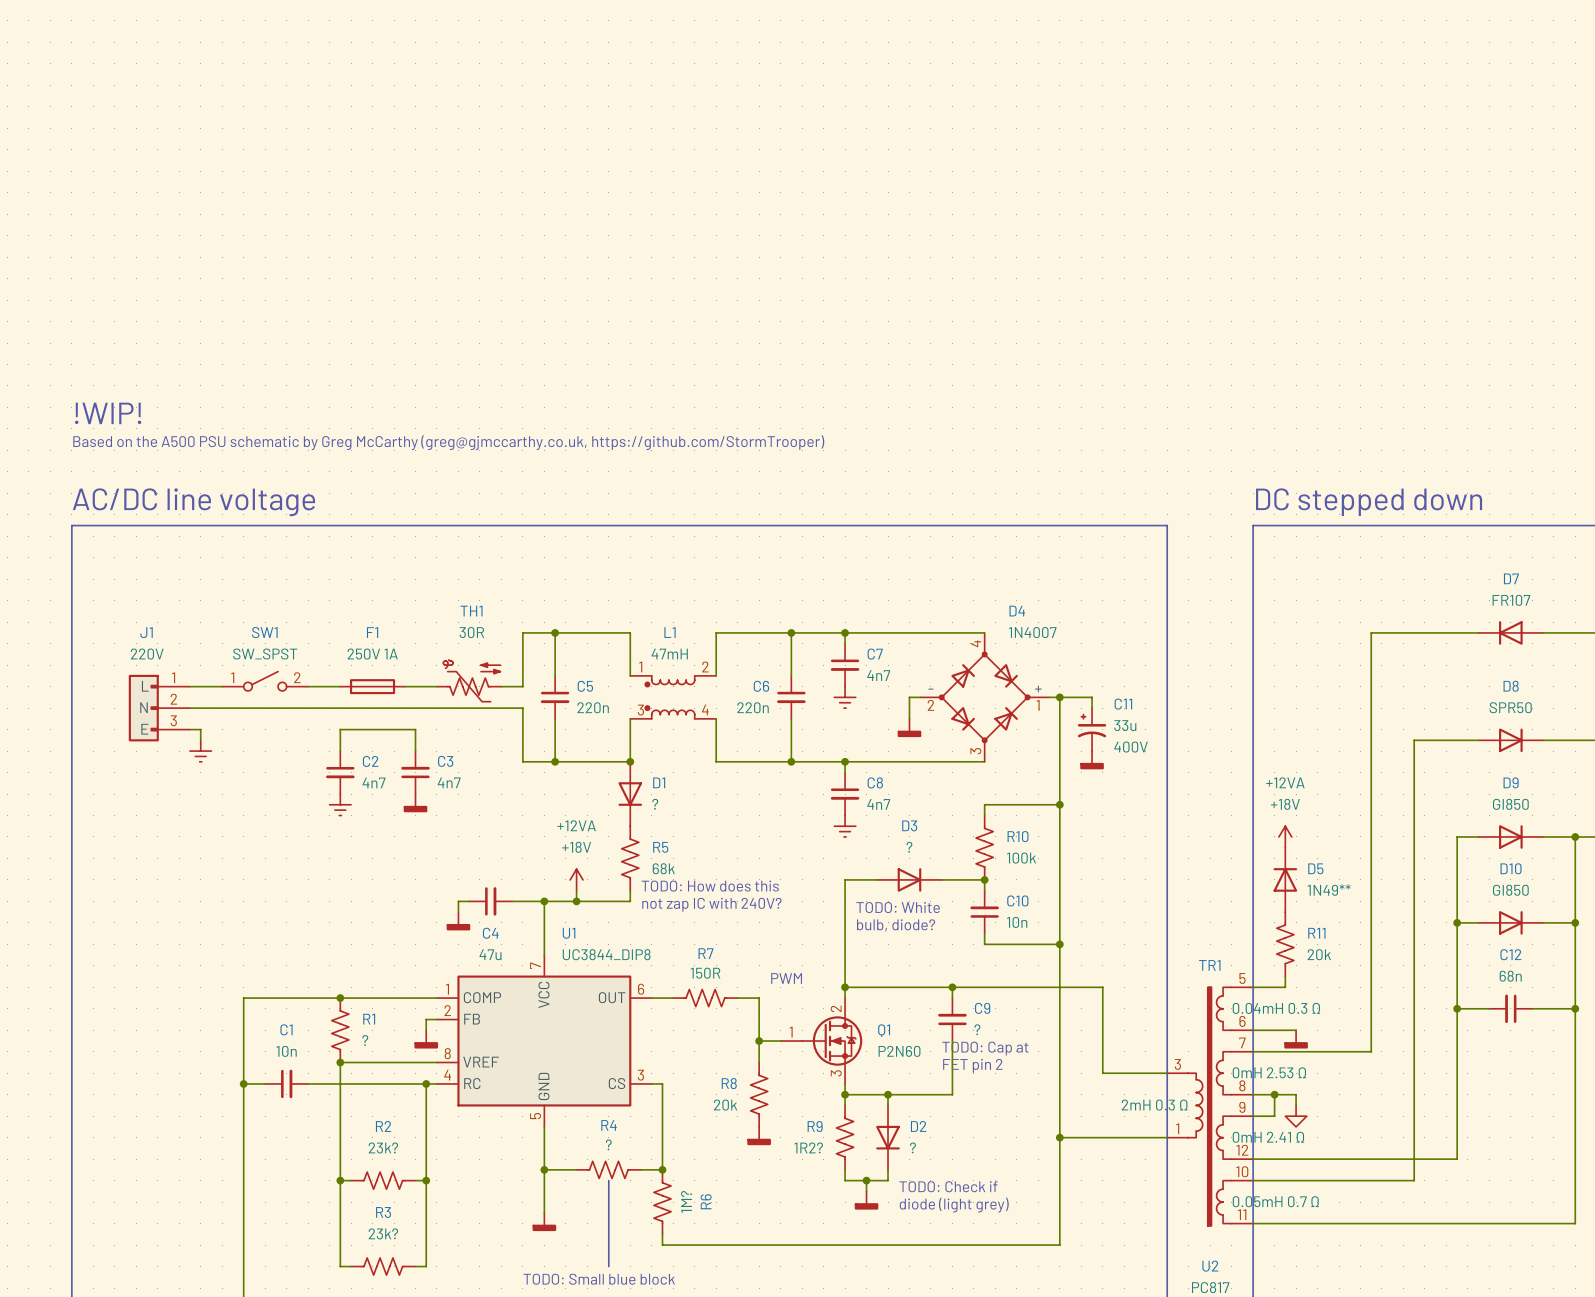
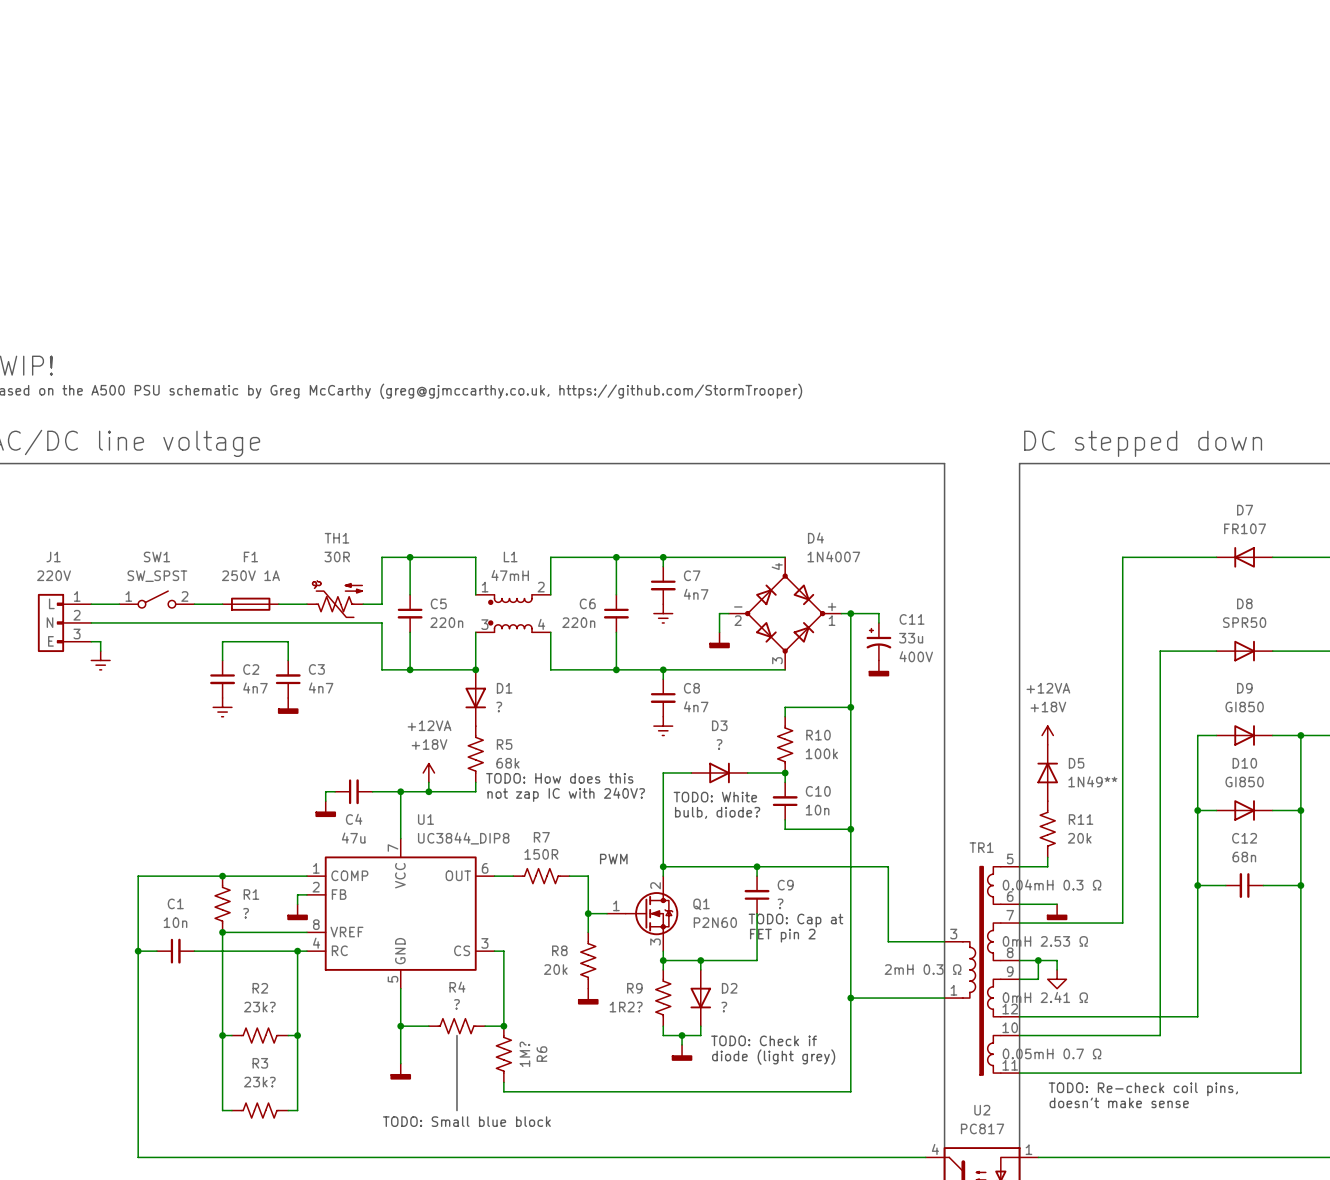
text: none -> TODO: Re-check coil pins, (1143, 1089)
text: none -> doesn't make sense (1119, 1102)

